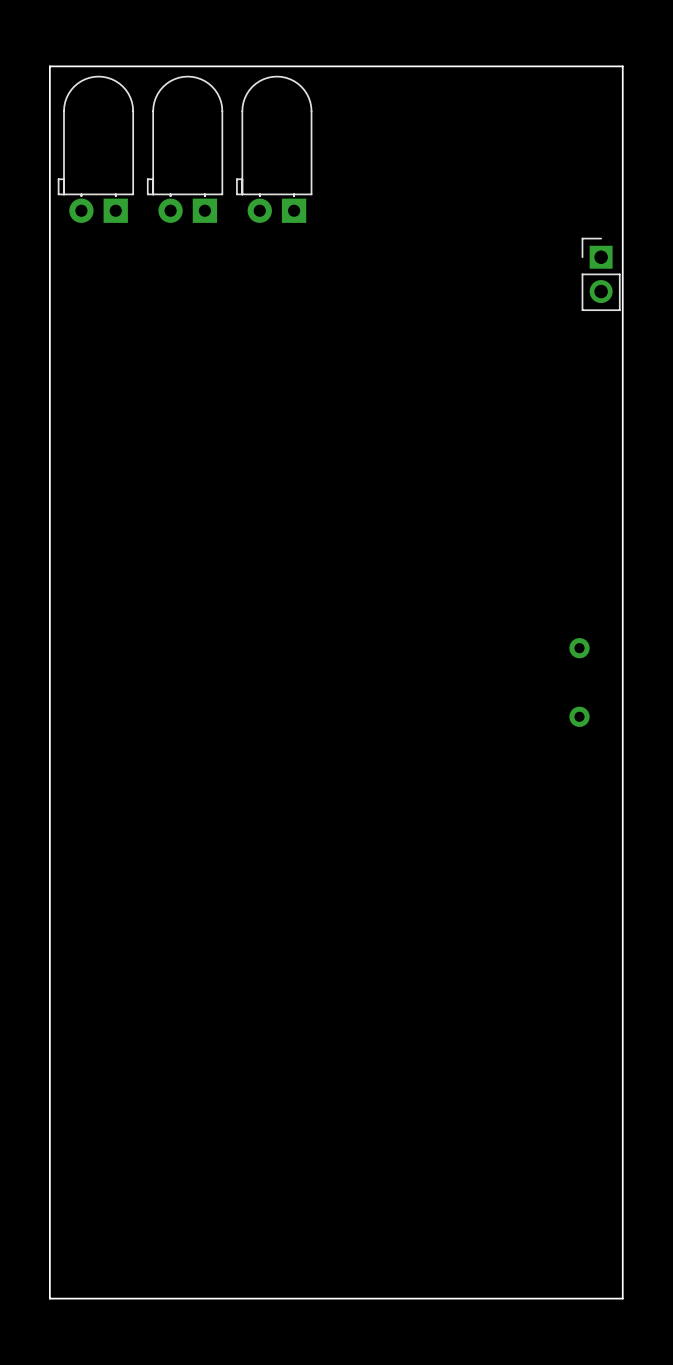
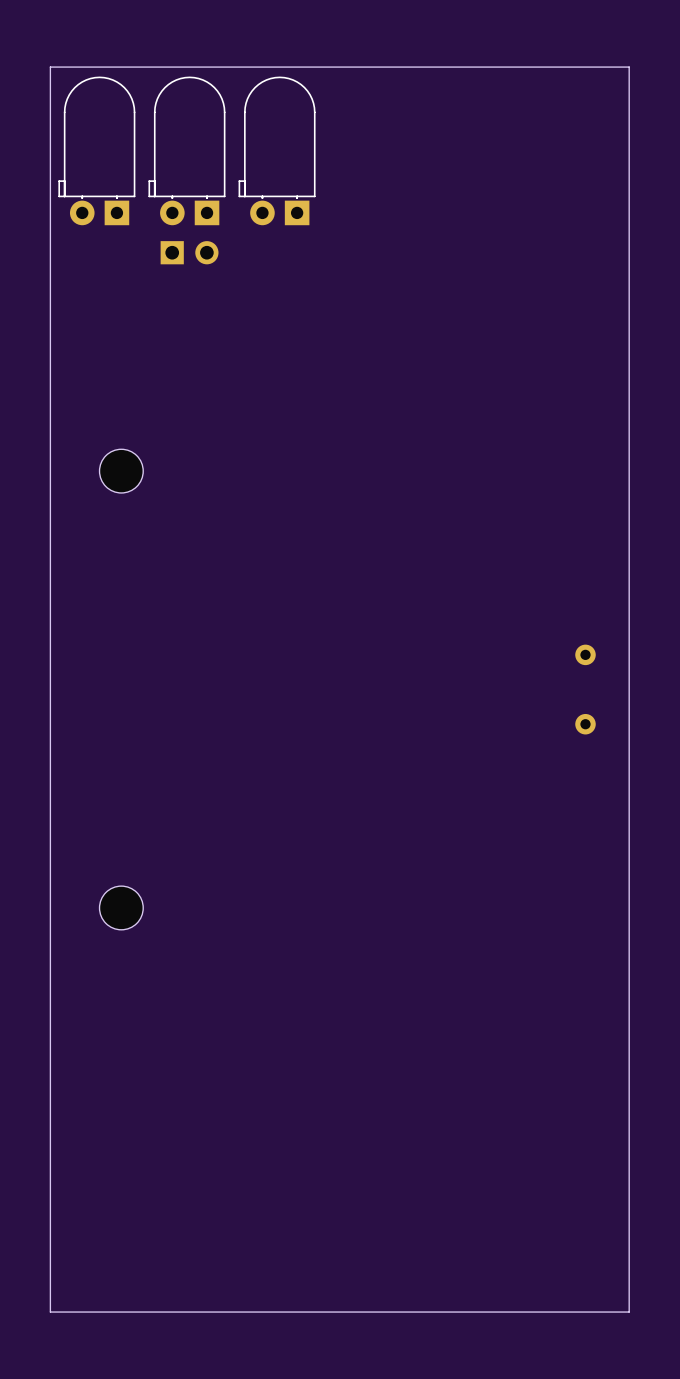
part: none -> (189, 252)
part: (601, 274) -> none
part: none -> (121, 471)
part: none -> (121, 907)

